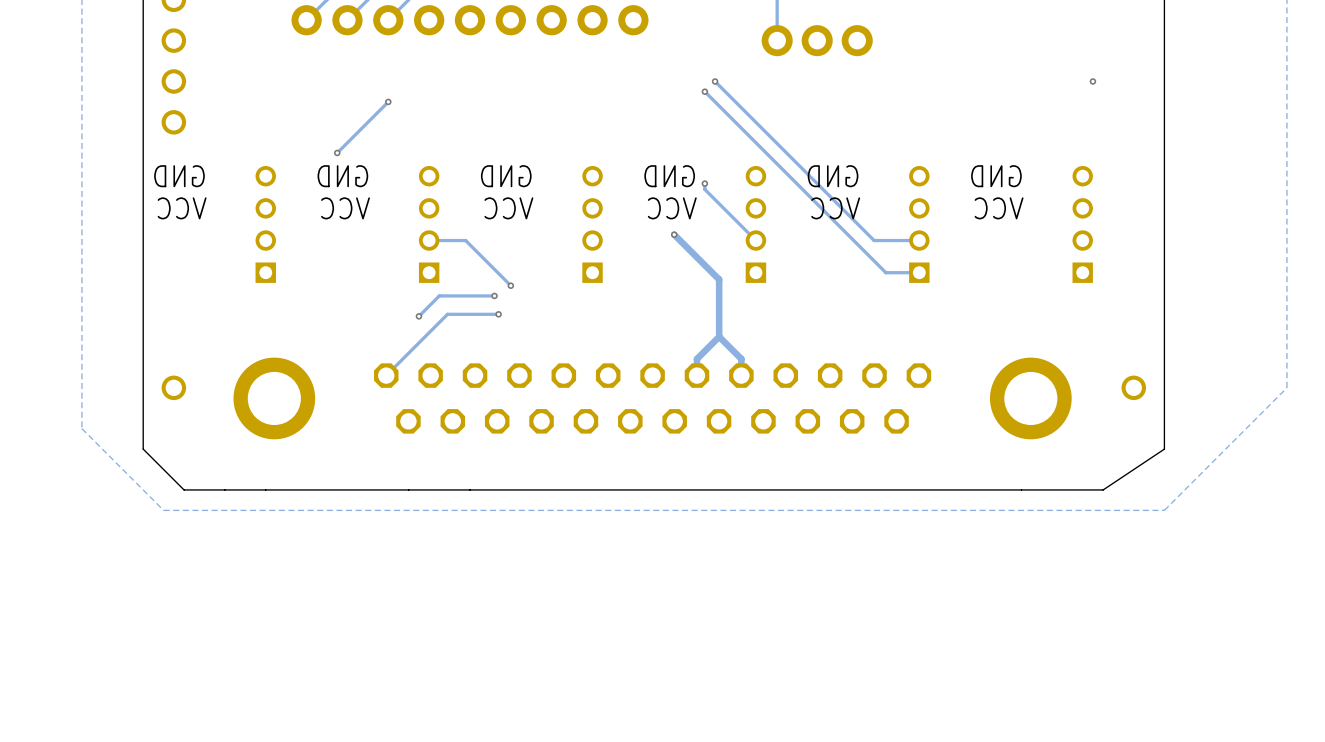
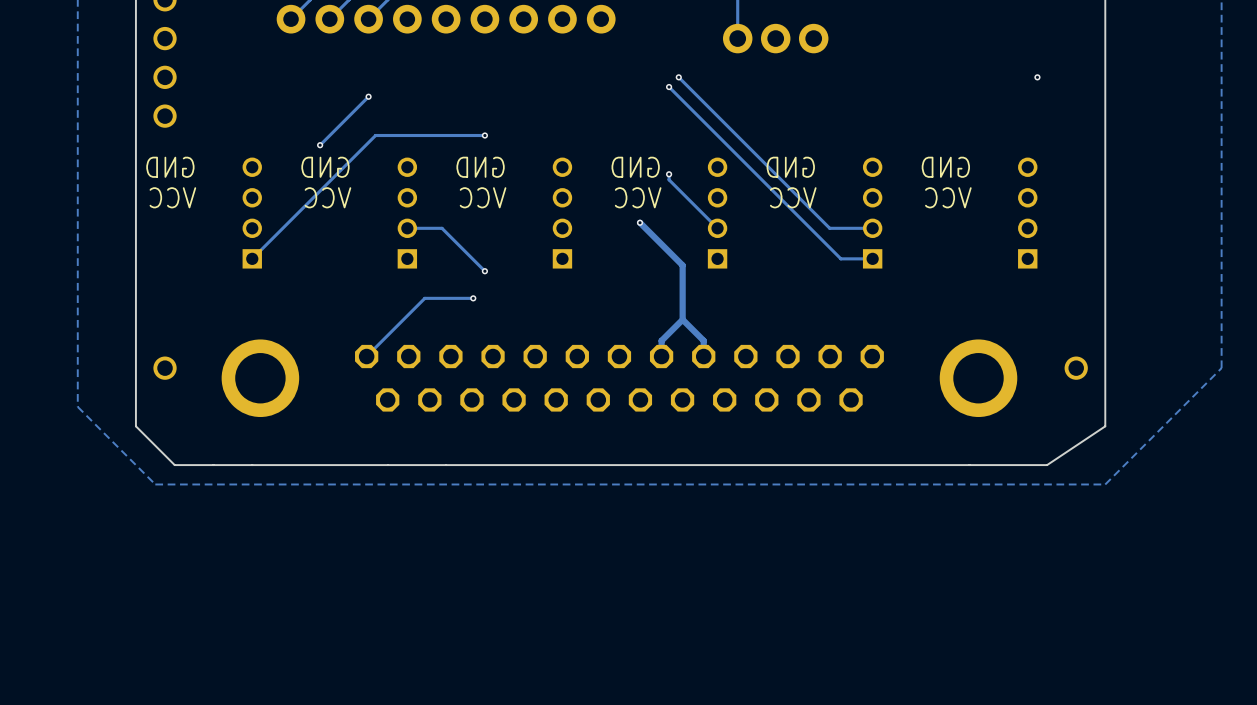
track: none -> (484, 135) (375, 135) (252, 258)
via: none -> (484, 135)
track: (494, 295) (439, 295) (418, 316) -> none
via: (494, 295) -> none
via: (418, 316) -> none

